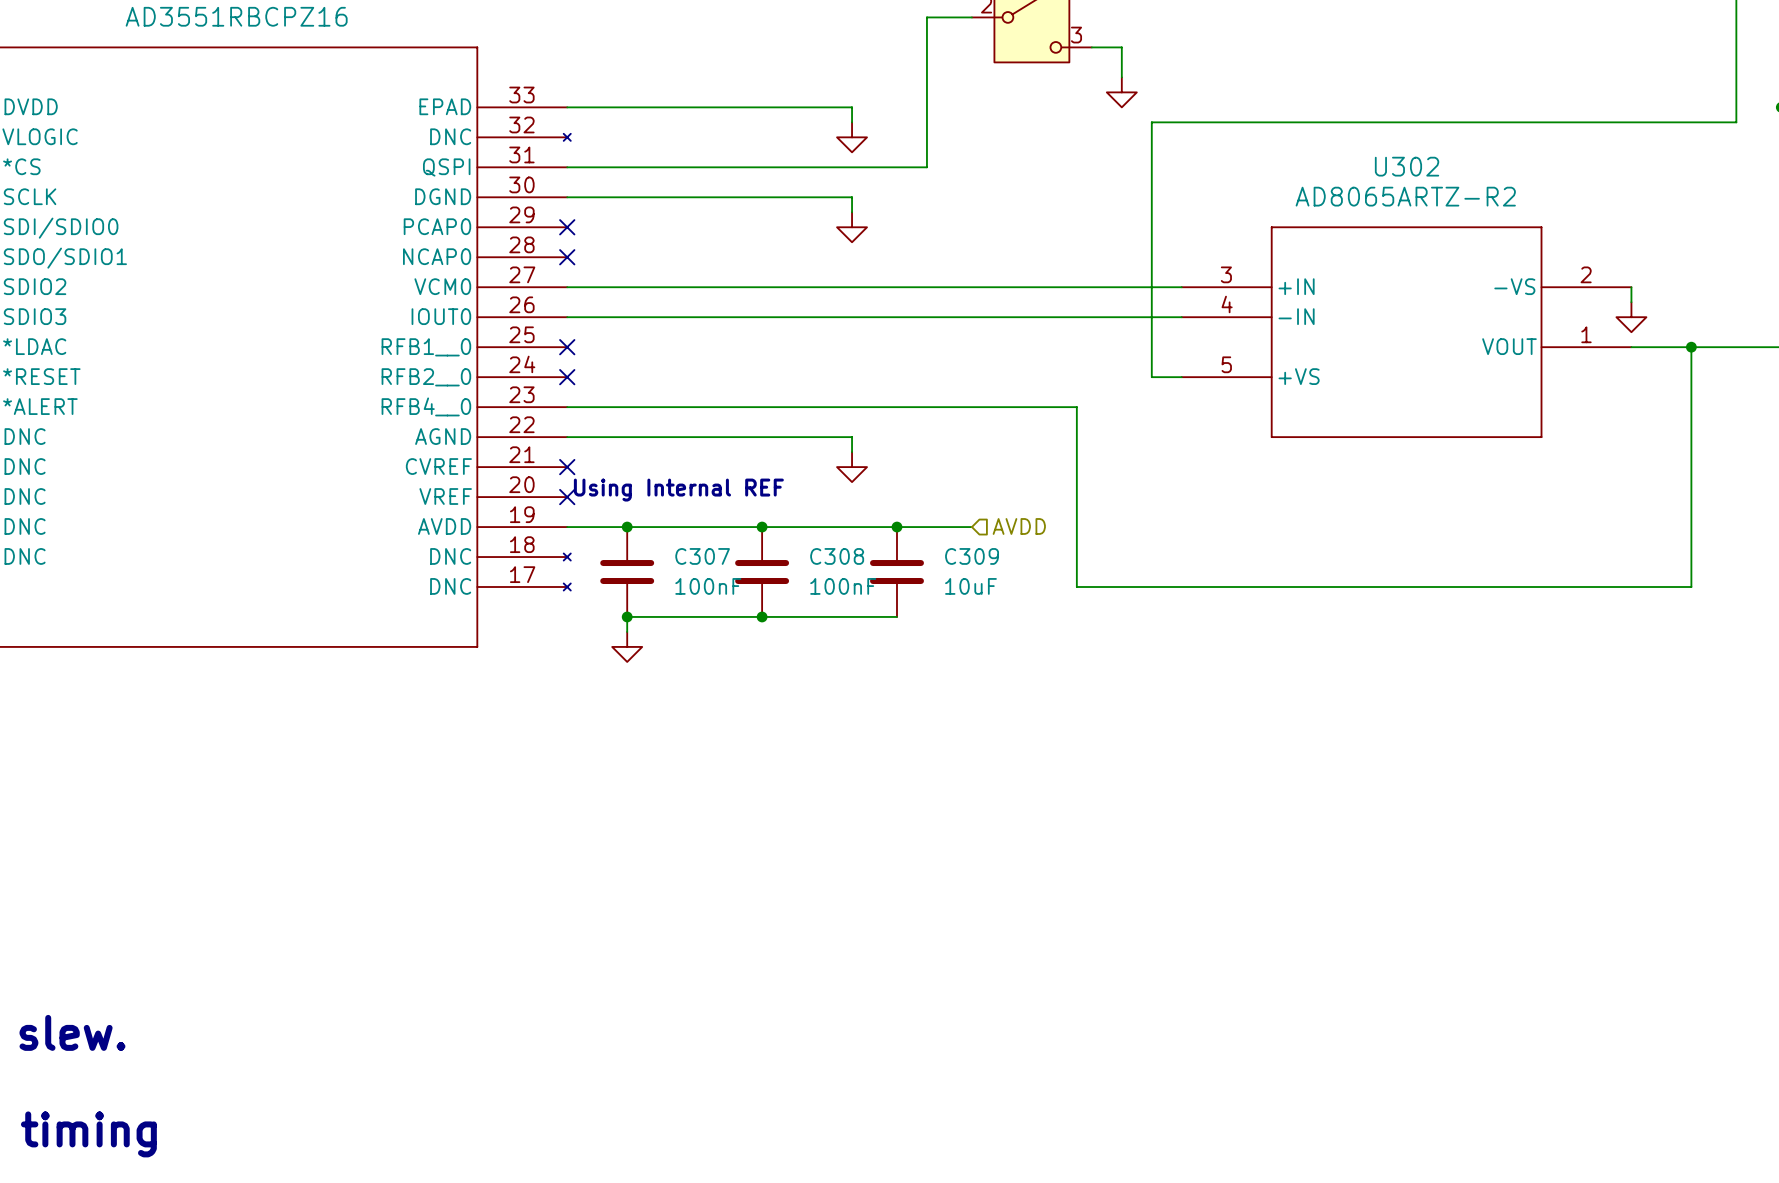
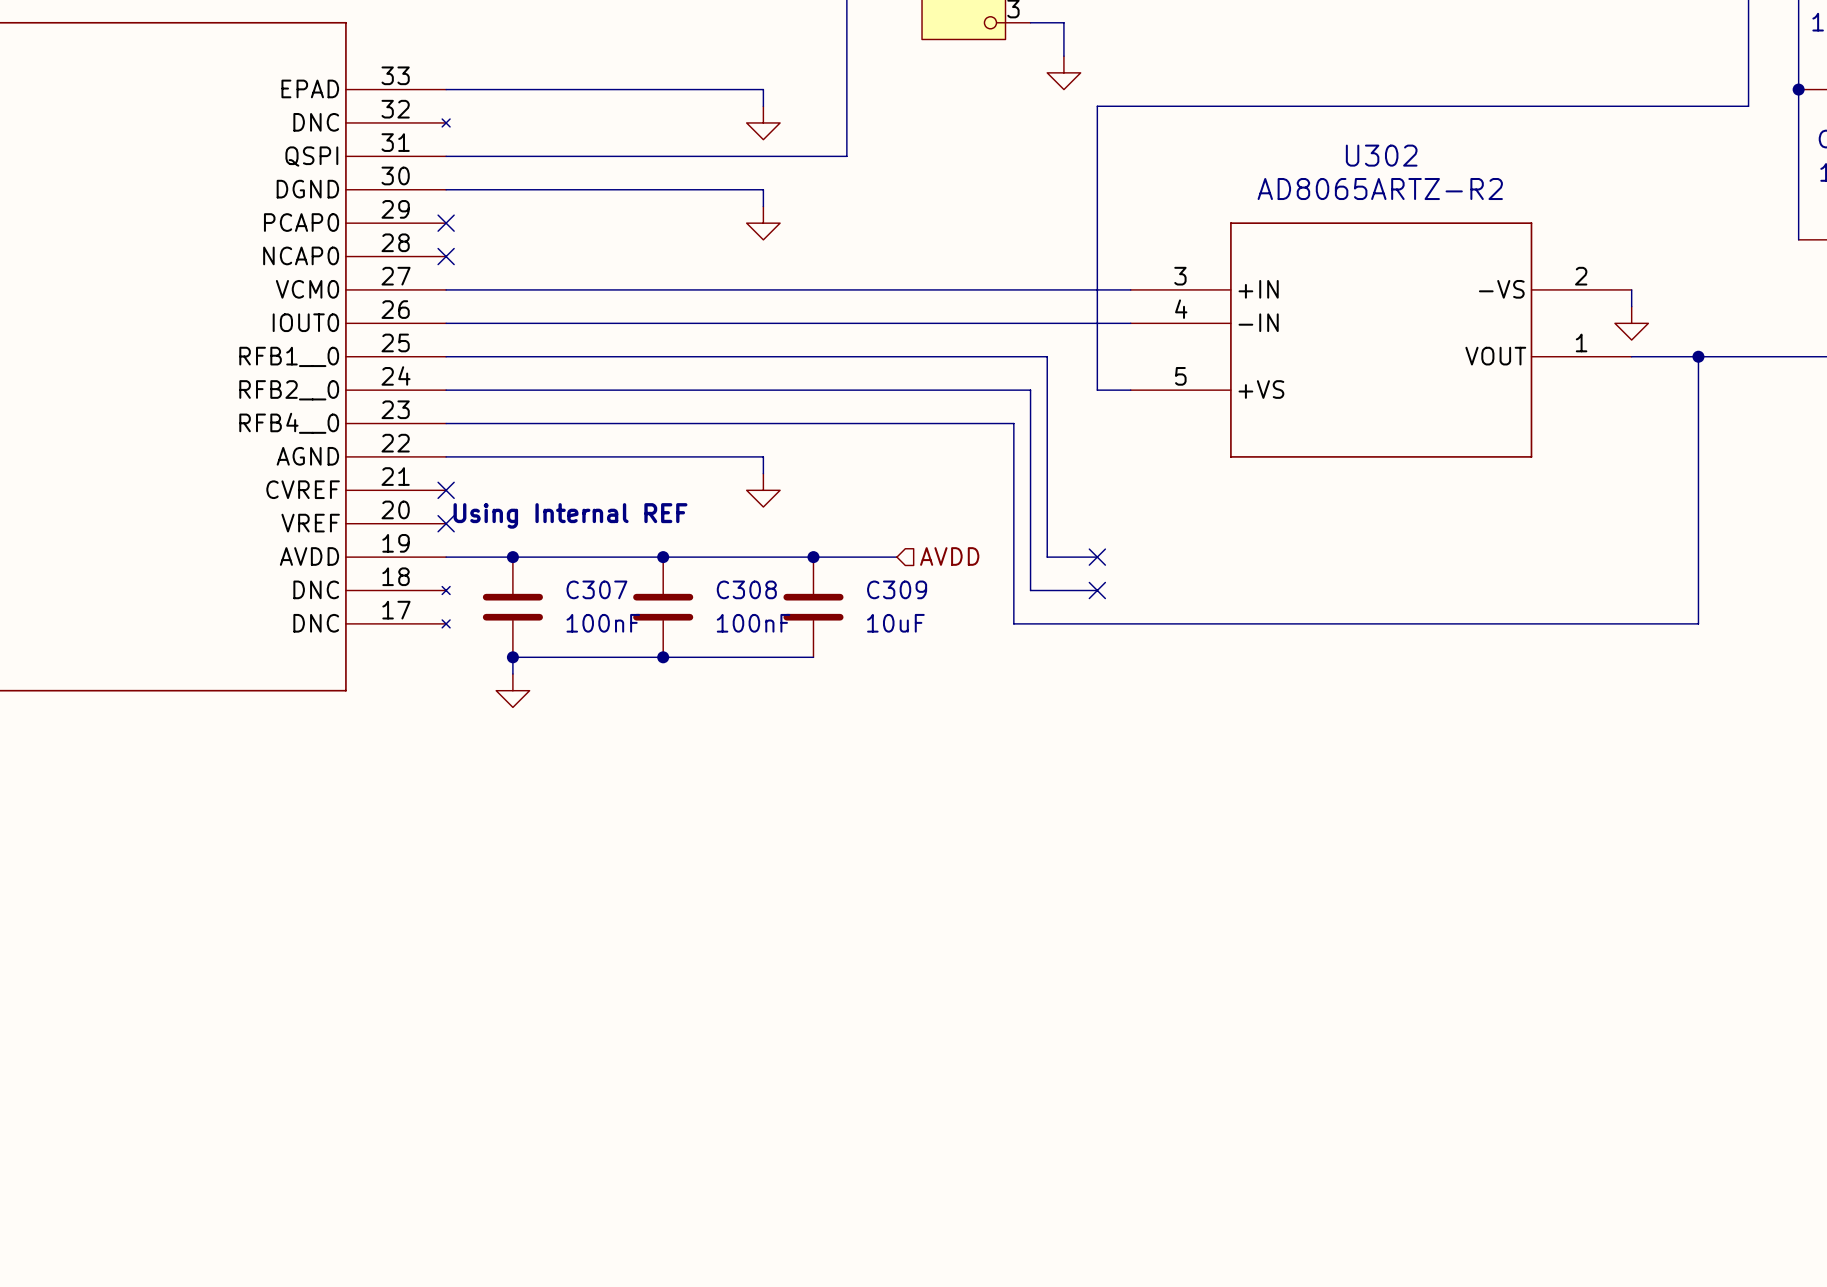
wire: none -> (446, 356) (1047, 356) (1047, 557) (1097, 557)
no-connect mark: (567, 347) -> none
wire: none -> (446, 390) (1030, 390) (1030, 590) (1097, 590)
no-connect mark: (567, 377) -> none
no-connect mark: none -> (1097, 557)
no-connect mark: none -> (1097, 590)

